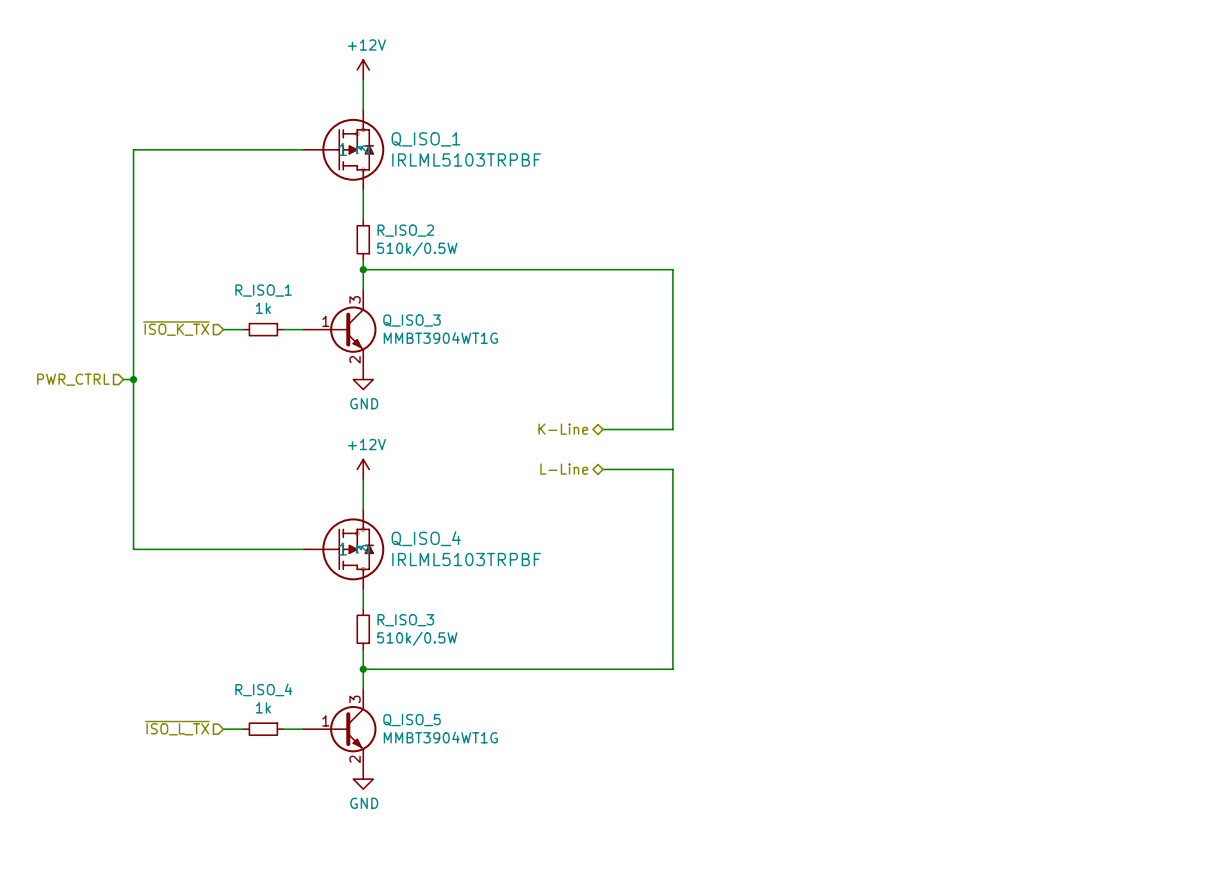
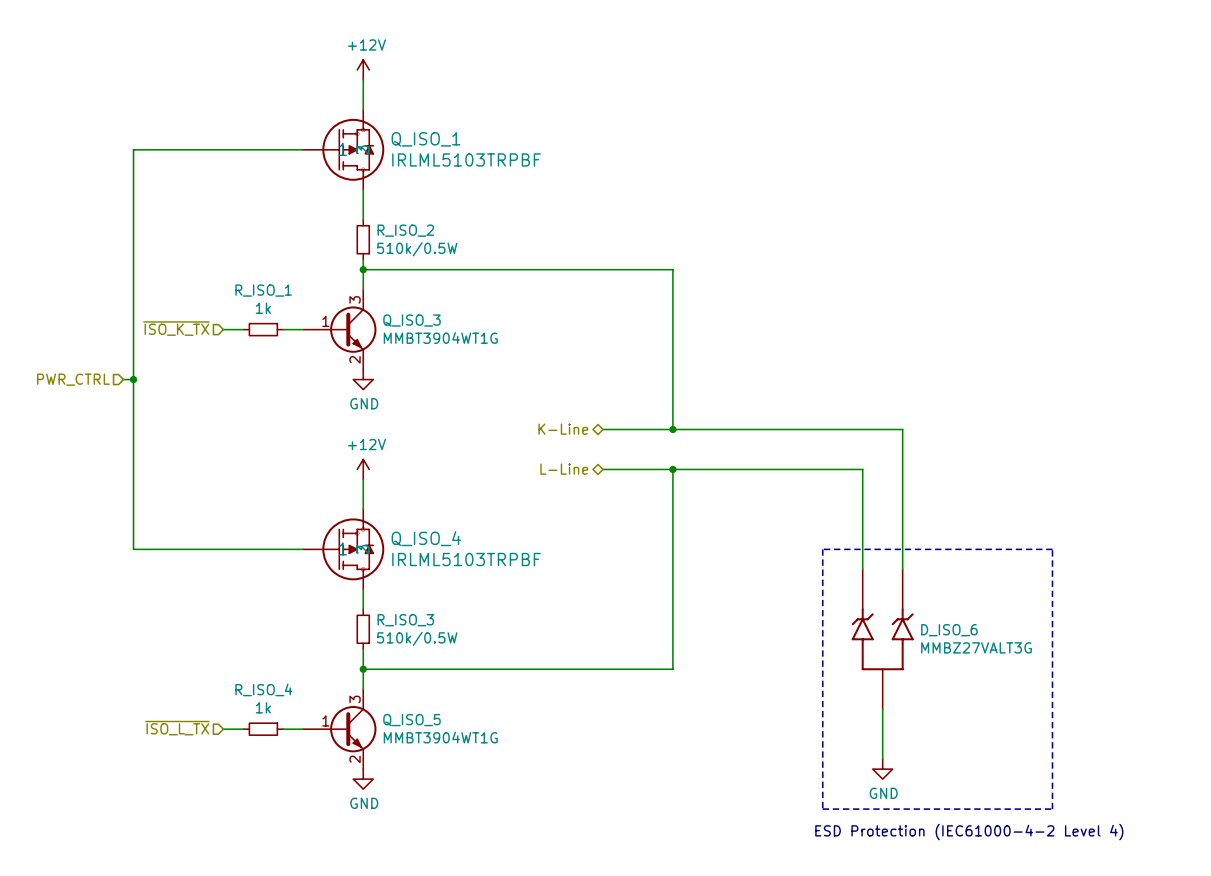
wire: none -> (672, 429) (902, 429) (902, 569)
junction: none -> (672, 429)
wire: none -> (672, 469) (862, 469) (862, 569)
junction: none -> (672, 469)
line: none -> (822, 549) (822, 809) (1052, 809) (1052, 549) (822, 549)
D_ISO_6: none -> MMBZ27VALT3G (882, 639)
wire: none -> (882, 709) (882, 759)
power symbol: none -> GND (882, 769)
text: none -> ESD Protection (IEC61000-4-2 Level 4) (969, 832)

